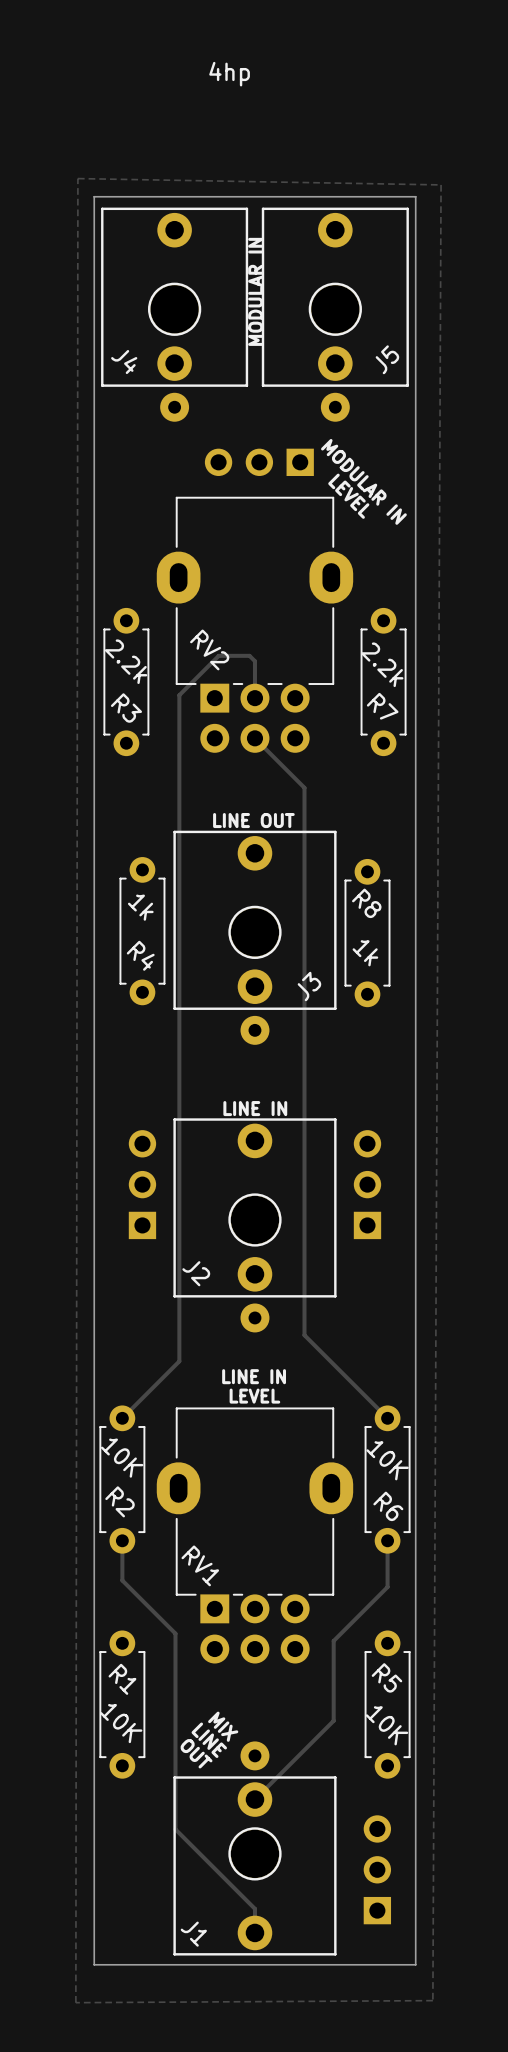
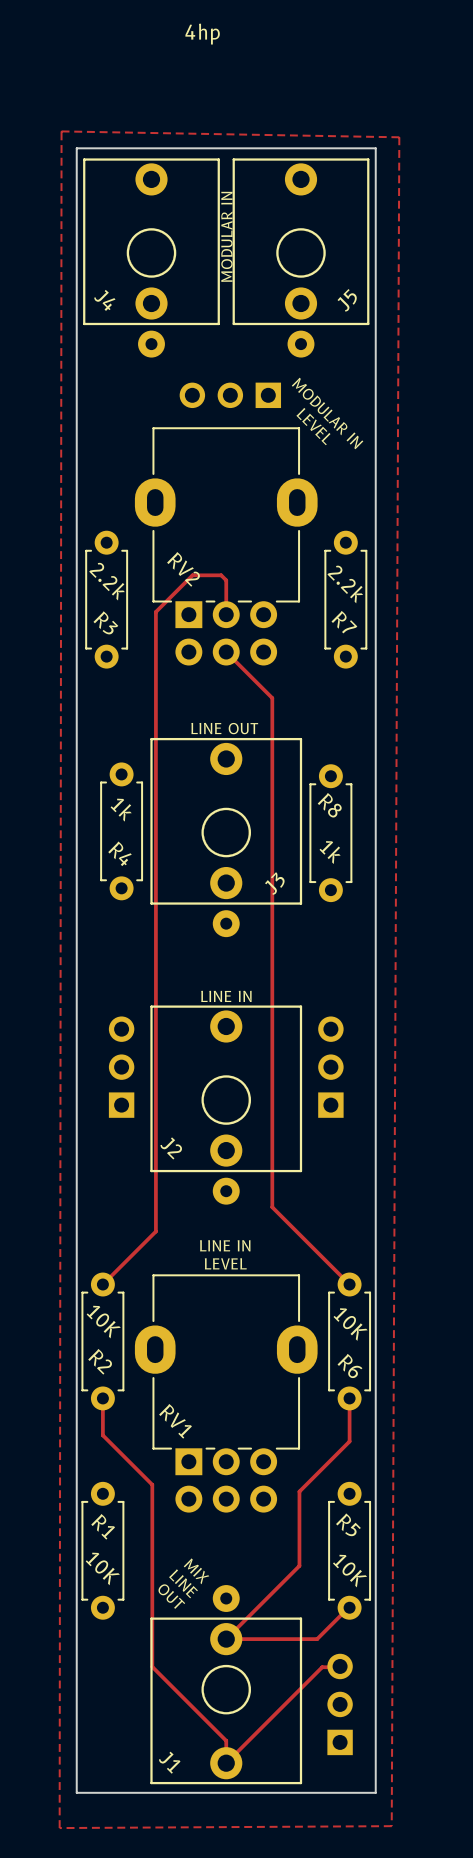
track: none -> (348, 1607) (317, 1639) (226, 1639)
track: none -> (339, 1664) (336, 1667) (322, 1667) (226, 1763)

